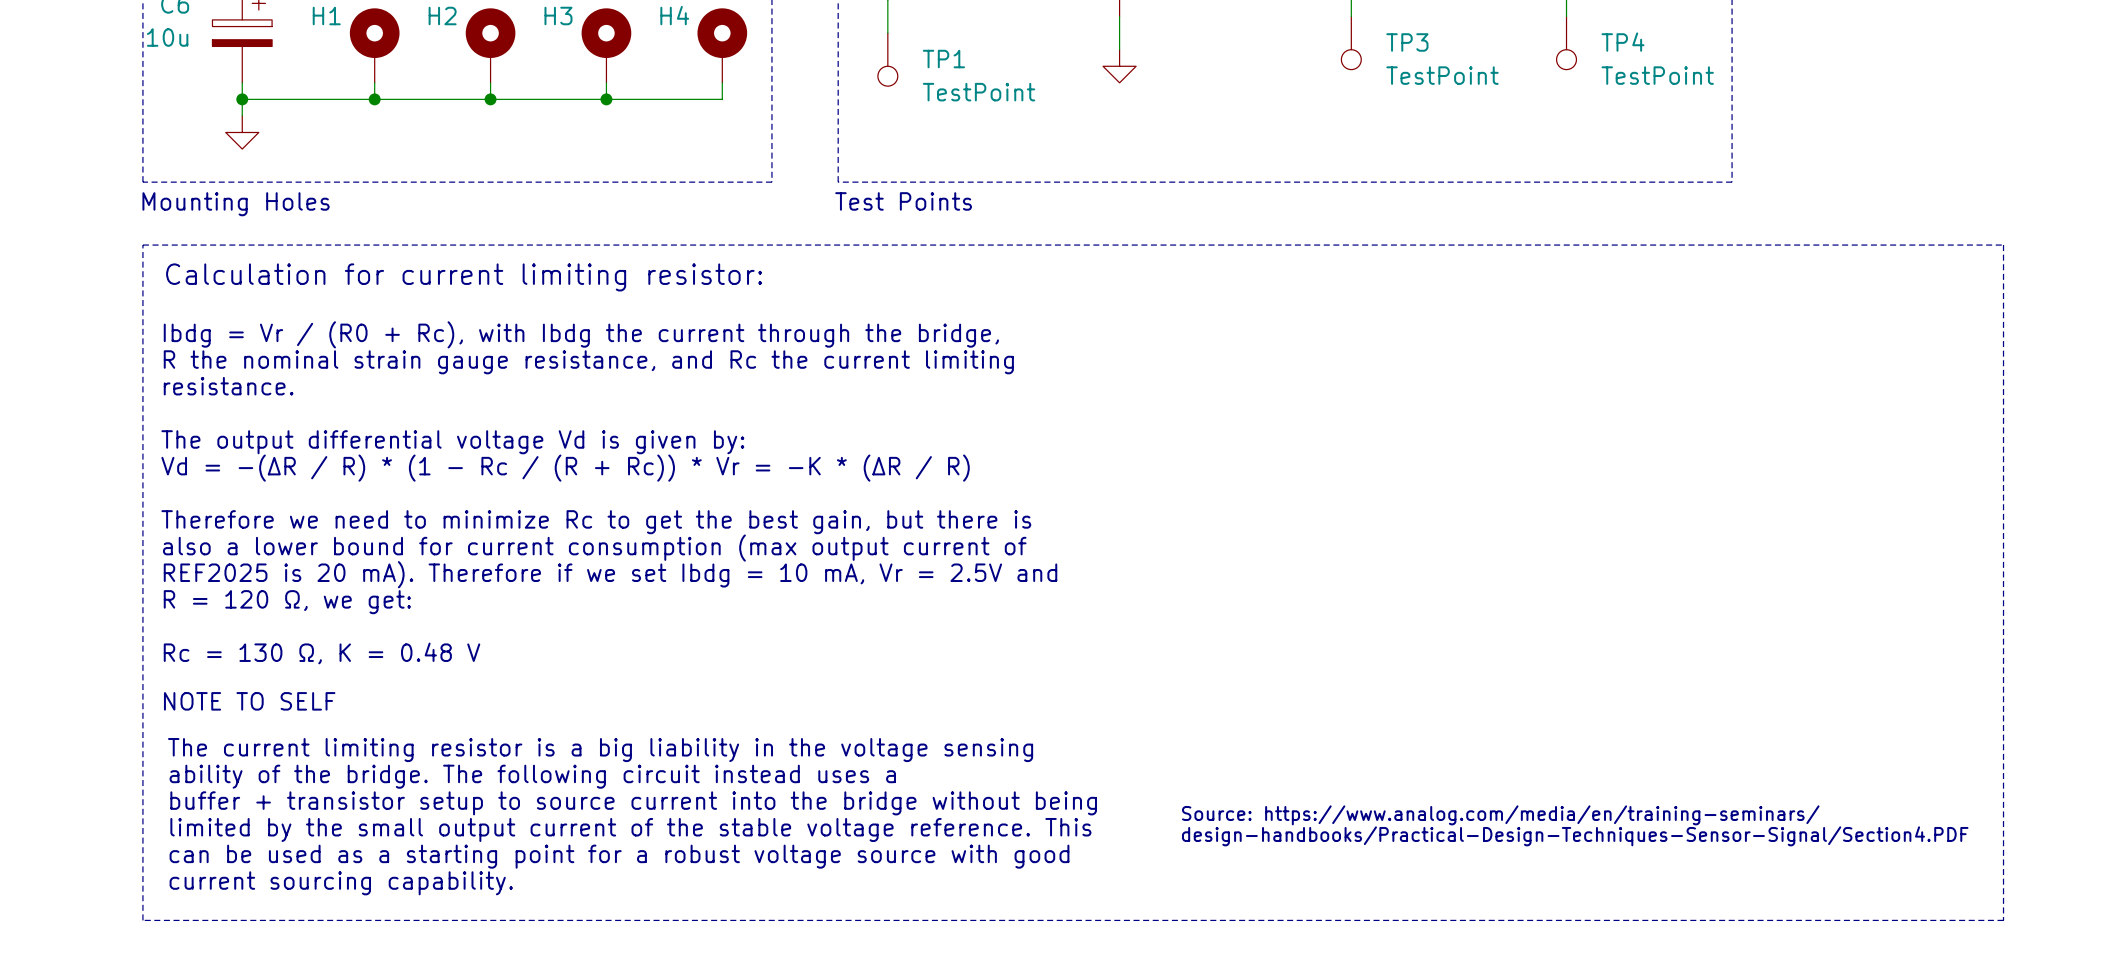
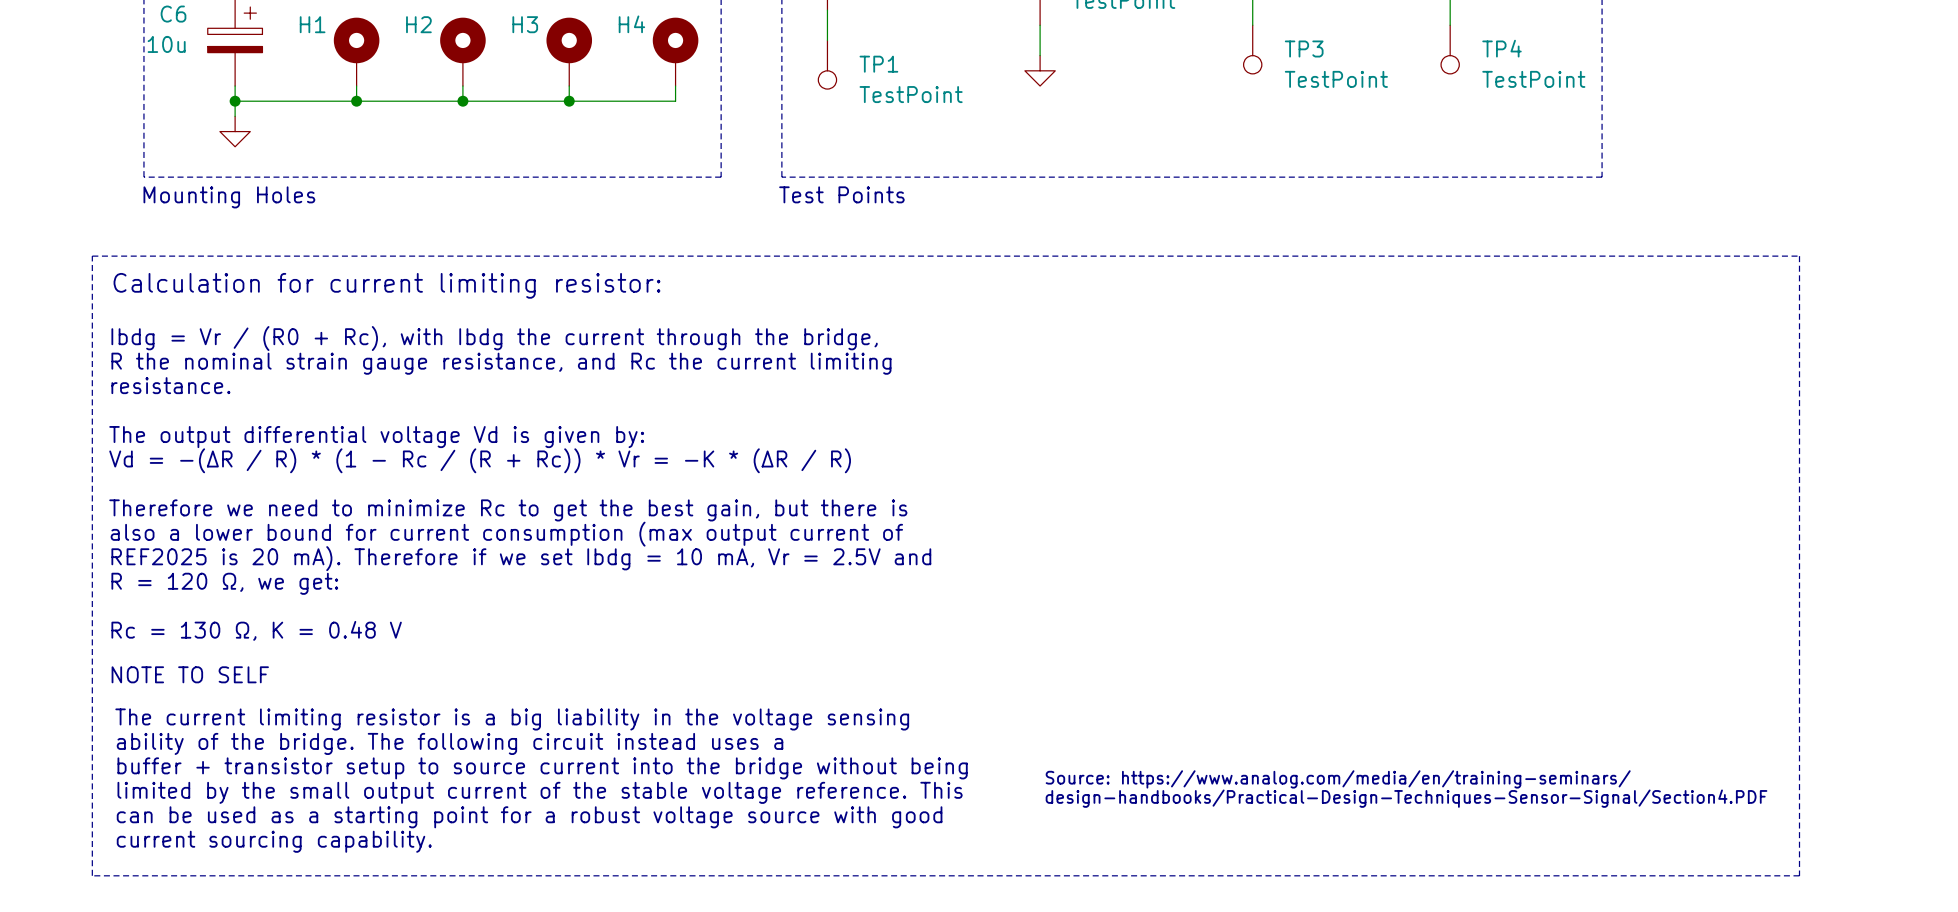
line: (142, 245) (2003, 245) (2003, 920) (142, 920) (142, 245) -> (92, 256) (1799, 256) (1799, 875) (92, 875) (92, 256)
text position: Calculation for current limiting resistor: (464, 277) -> Calculation for current limiting resistor: (386, 285)
text position: Ibdg = Vr / (R0 + Rc), with Ibdg the current through the bridge, (581, 334) -> Ibdg = Vr / (R0 + Rc), with Ibdg the current through the bridge, (494, 338)
text position: R the nominal strain gauge resistance, and Rc the current limiting (588, 362) -> R the nominal strain gauge resistance, and Rc the current limiting (501, 363)
text position: resistance. (228, 386) -> resistance. (170, 385)
text position: The output differential voltage Vd is given by: (452, 442) -> The output differential voltage Vd is given by: (376, 437)
text position: Vd = -(ΔR / R) * (1 - Rc / (R + Rc)) * Vr = -K * (ΔR / R) (565, 468) -> Vd = -(ΔR / R) * (1 - Rc / (R + Rc)) * Vr = -K * (ΔR / R) (480, 460)
text position: Therefore we need to minimize Rc to get the best gain, but there is (596, 522) -> Therefore we need to minimize Rc to get the best gain, but there is (508, 510)
text position: also a lower bound for current consumption (max output current of (594, 548) -> also a lower bound for current consumption (max output current of (506, 534)
text position: REF2025 is 20 mA). Therefore if we set Ibdg = 10 mA, Vr = 2.5V and (610, 574) -> REF2025 is 20 mA). Therefore if we set Ibdg = 10 mA, Vr = 2.5V and (521, 558)
text position: R = 120 Ω, we get: (287, 602) -> R = 120 Ω, we get: (224, 583)
text position: Rc = 130 Ω, K = 0.48 V (322, 653) -> Rc = 130 Ω, K = 0.48 V (256, 630)
text position: NOTE TO SELF (249, 701) -> NOTE TO SELF (190, 674)
text position: The current limiting resistor is a big liability in the voltage sensing (600, 750) -> The current limiting resistor is a big liability in the voltage sensing (512, 719)
text position: ability of the bridge. The following circuit instead uses a (532, 776) -> ability of the bridge. The following circuit instead uses a (450, 743)
text position: buffer + transistor setup to source current into the bridge without being (633, 803) -> buffer + transistor setup to source current into the bridge without being (542, 768)
text position: Source: https://www.analog.com/media/en/training-seminars/ (1500, 815) -> Source: https://www.analog.com/media/en/training-seminars/ (1338, 779)
text position: limited by the small output current of the stable voltage reference. This (630, 829) -> limited by the small output current of the stable voltage reference. This (540, 792)
text position: design-handbooks/Practical-Design-Techniques-Sensor-Signal/Section4.PDF (1575, 836) -> design-handbooks/Practical-Design-Techniques-Sensor-Signal/Section4.PDF (1406, 798)
text position: can be used as a starting point for a robust voltage source with good (619, 856) -> can be used as a starting point for a robust voltage source with good (529, 817)
text position: current sourcing capability. (341, 883) -> current sourcing capability. (274, 841)

